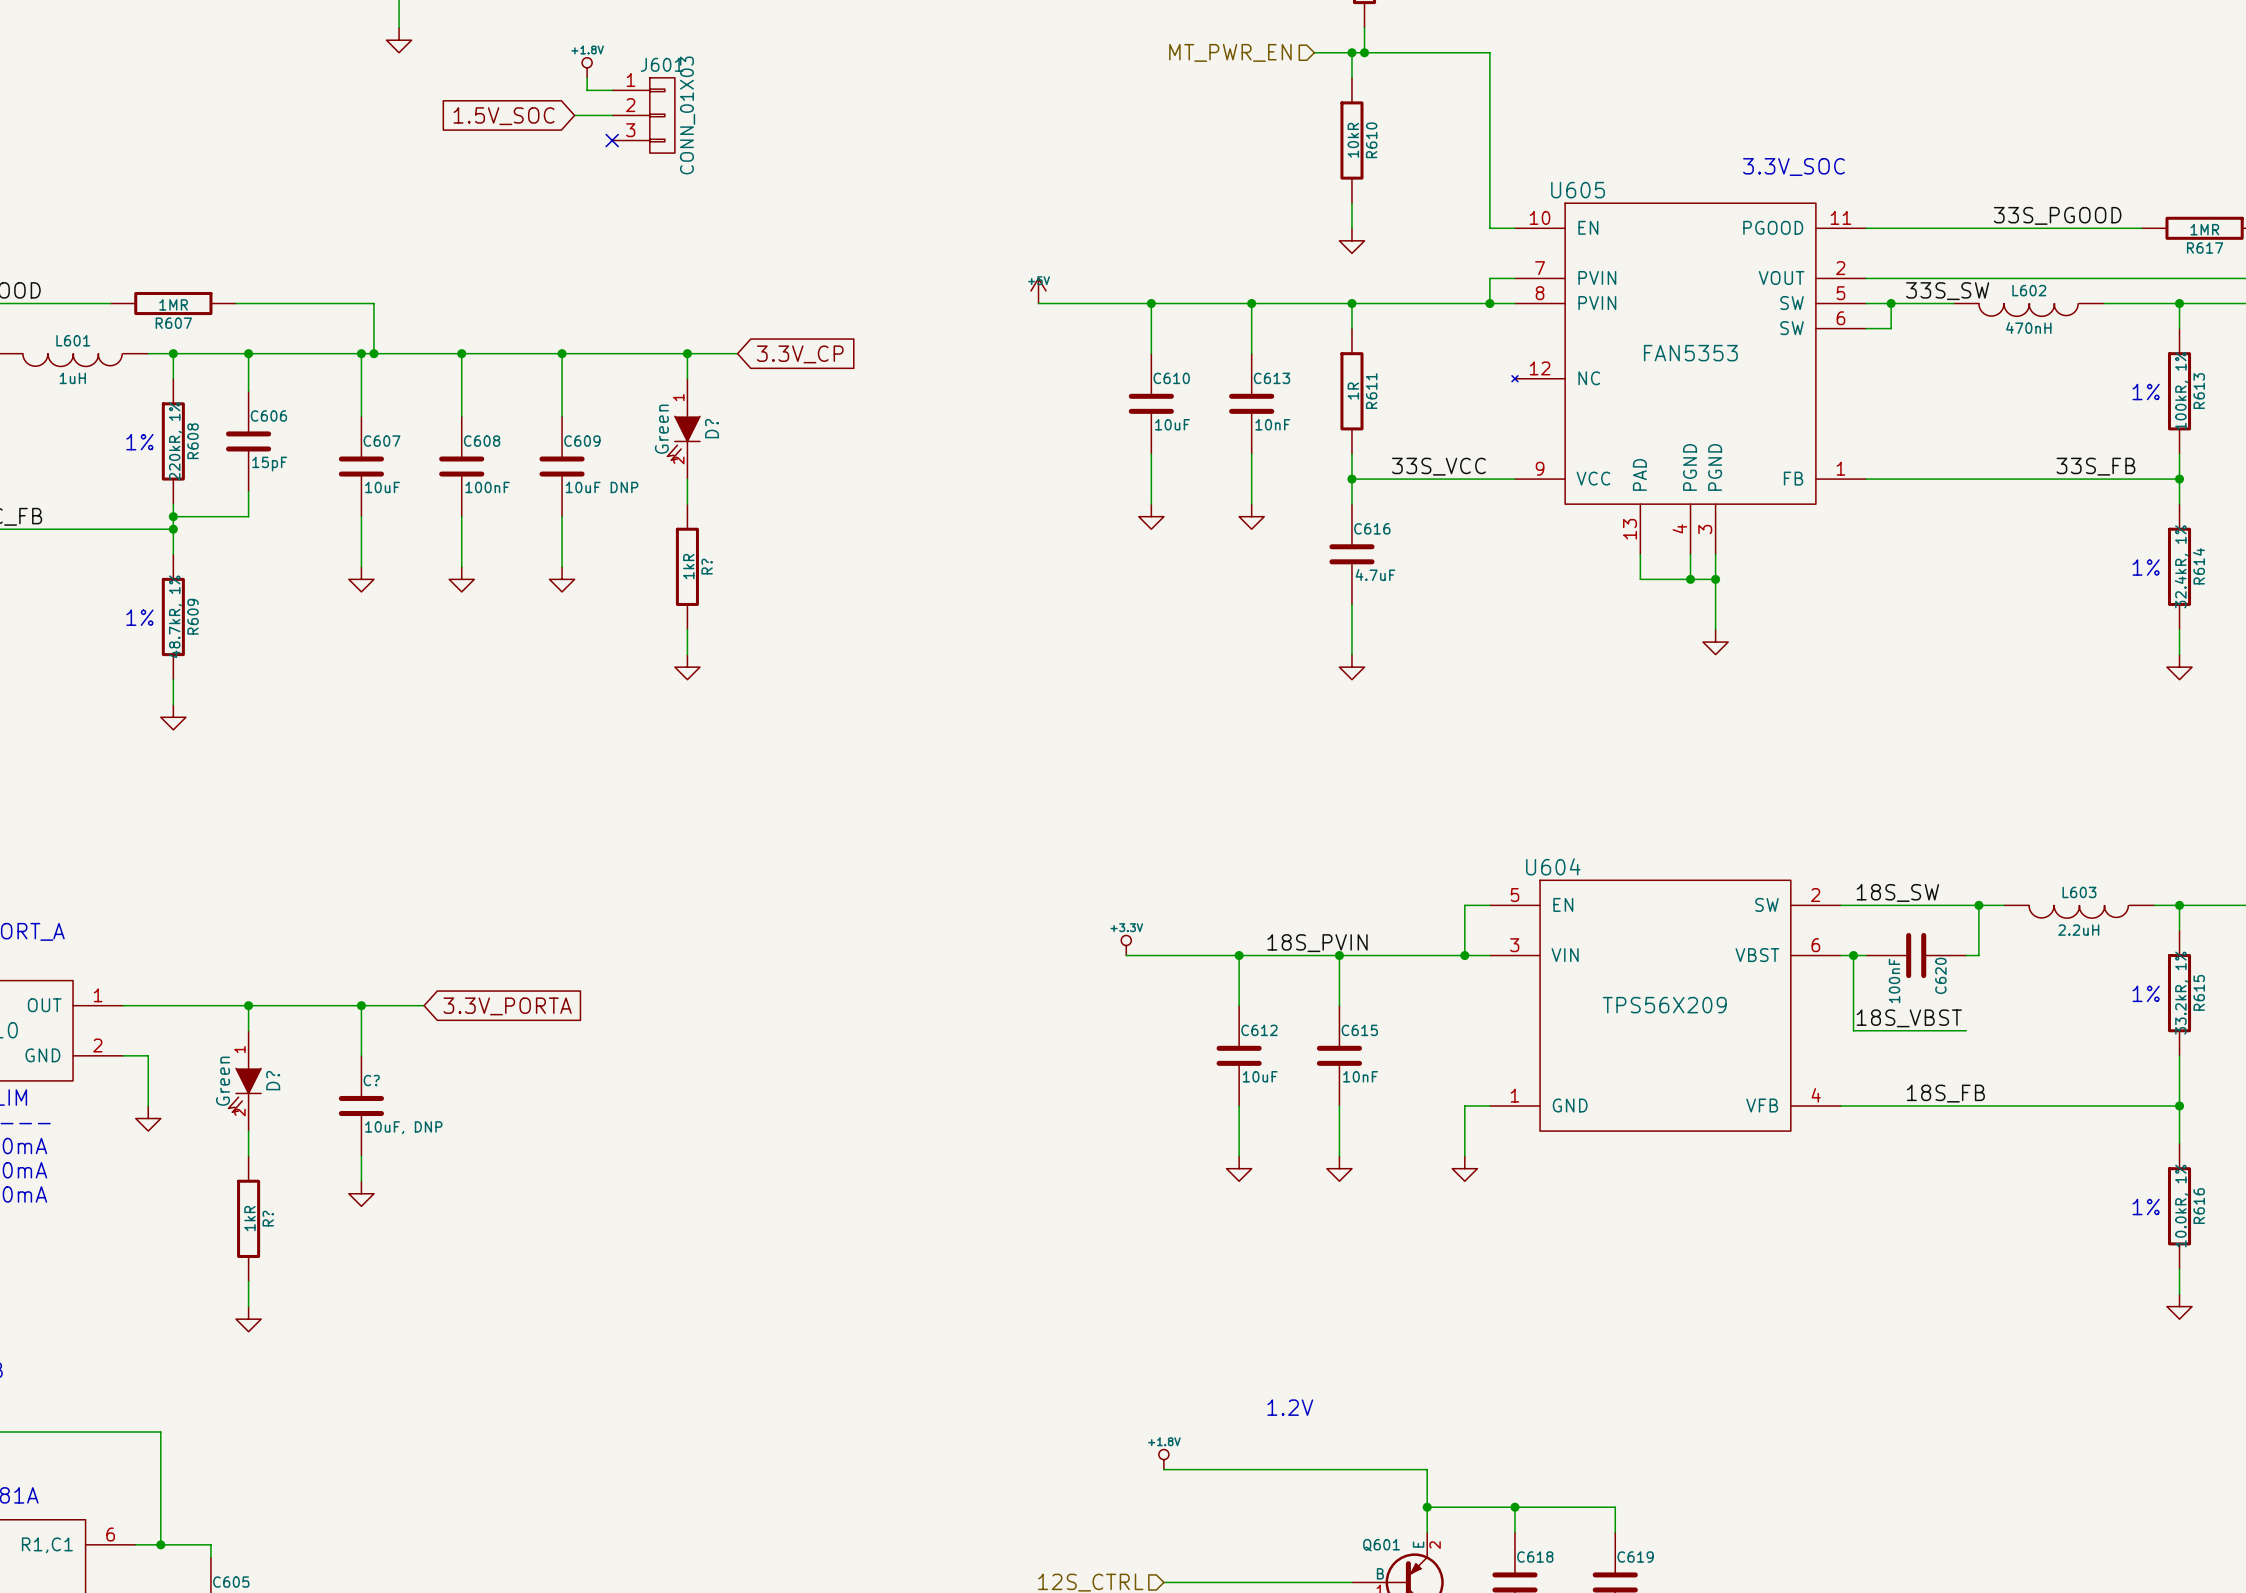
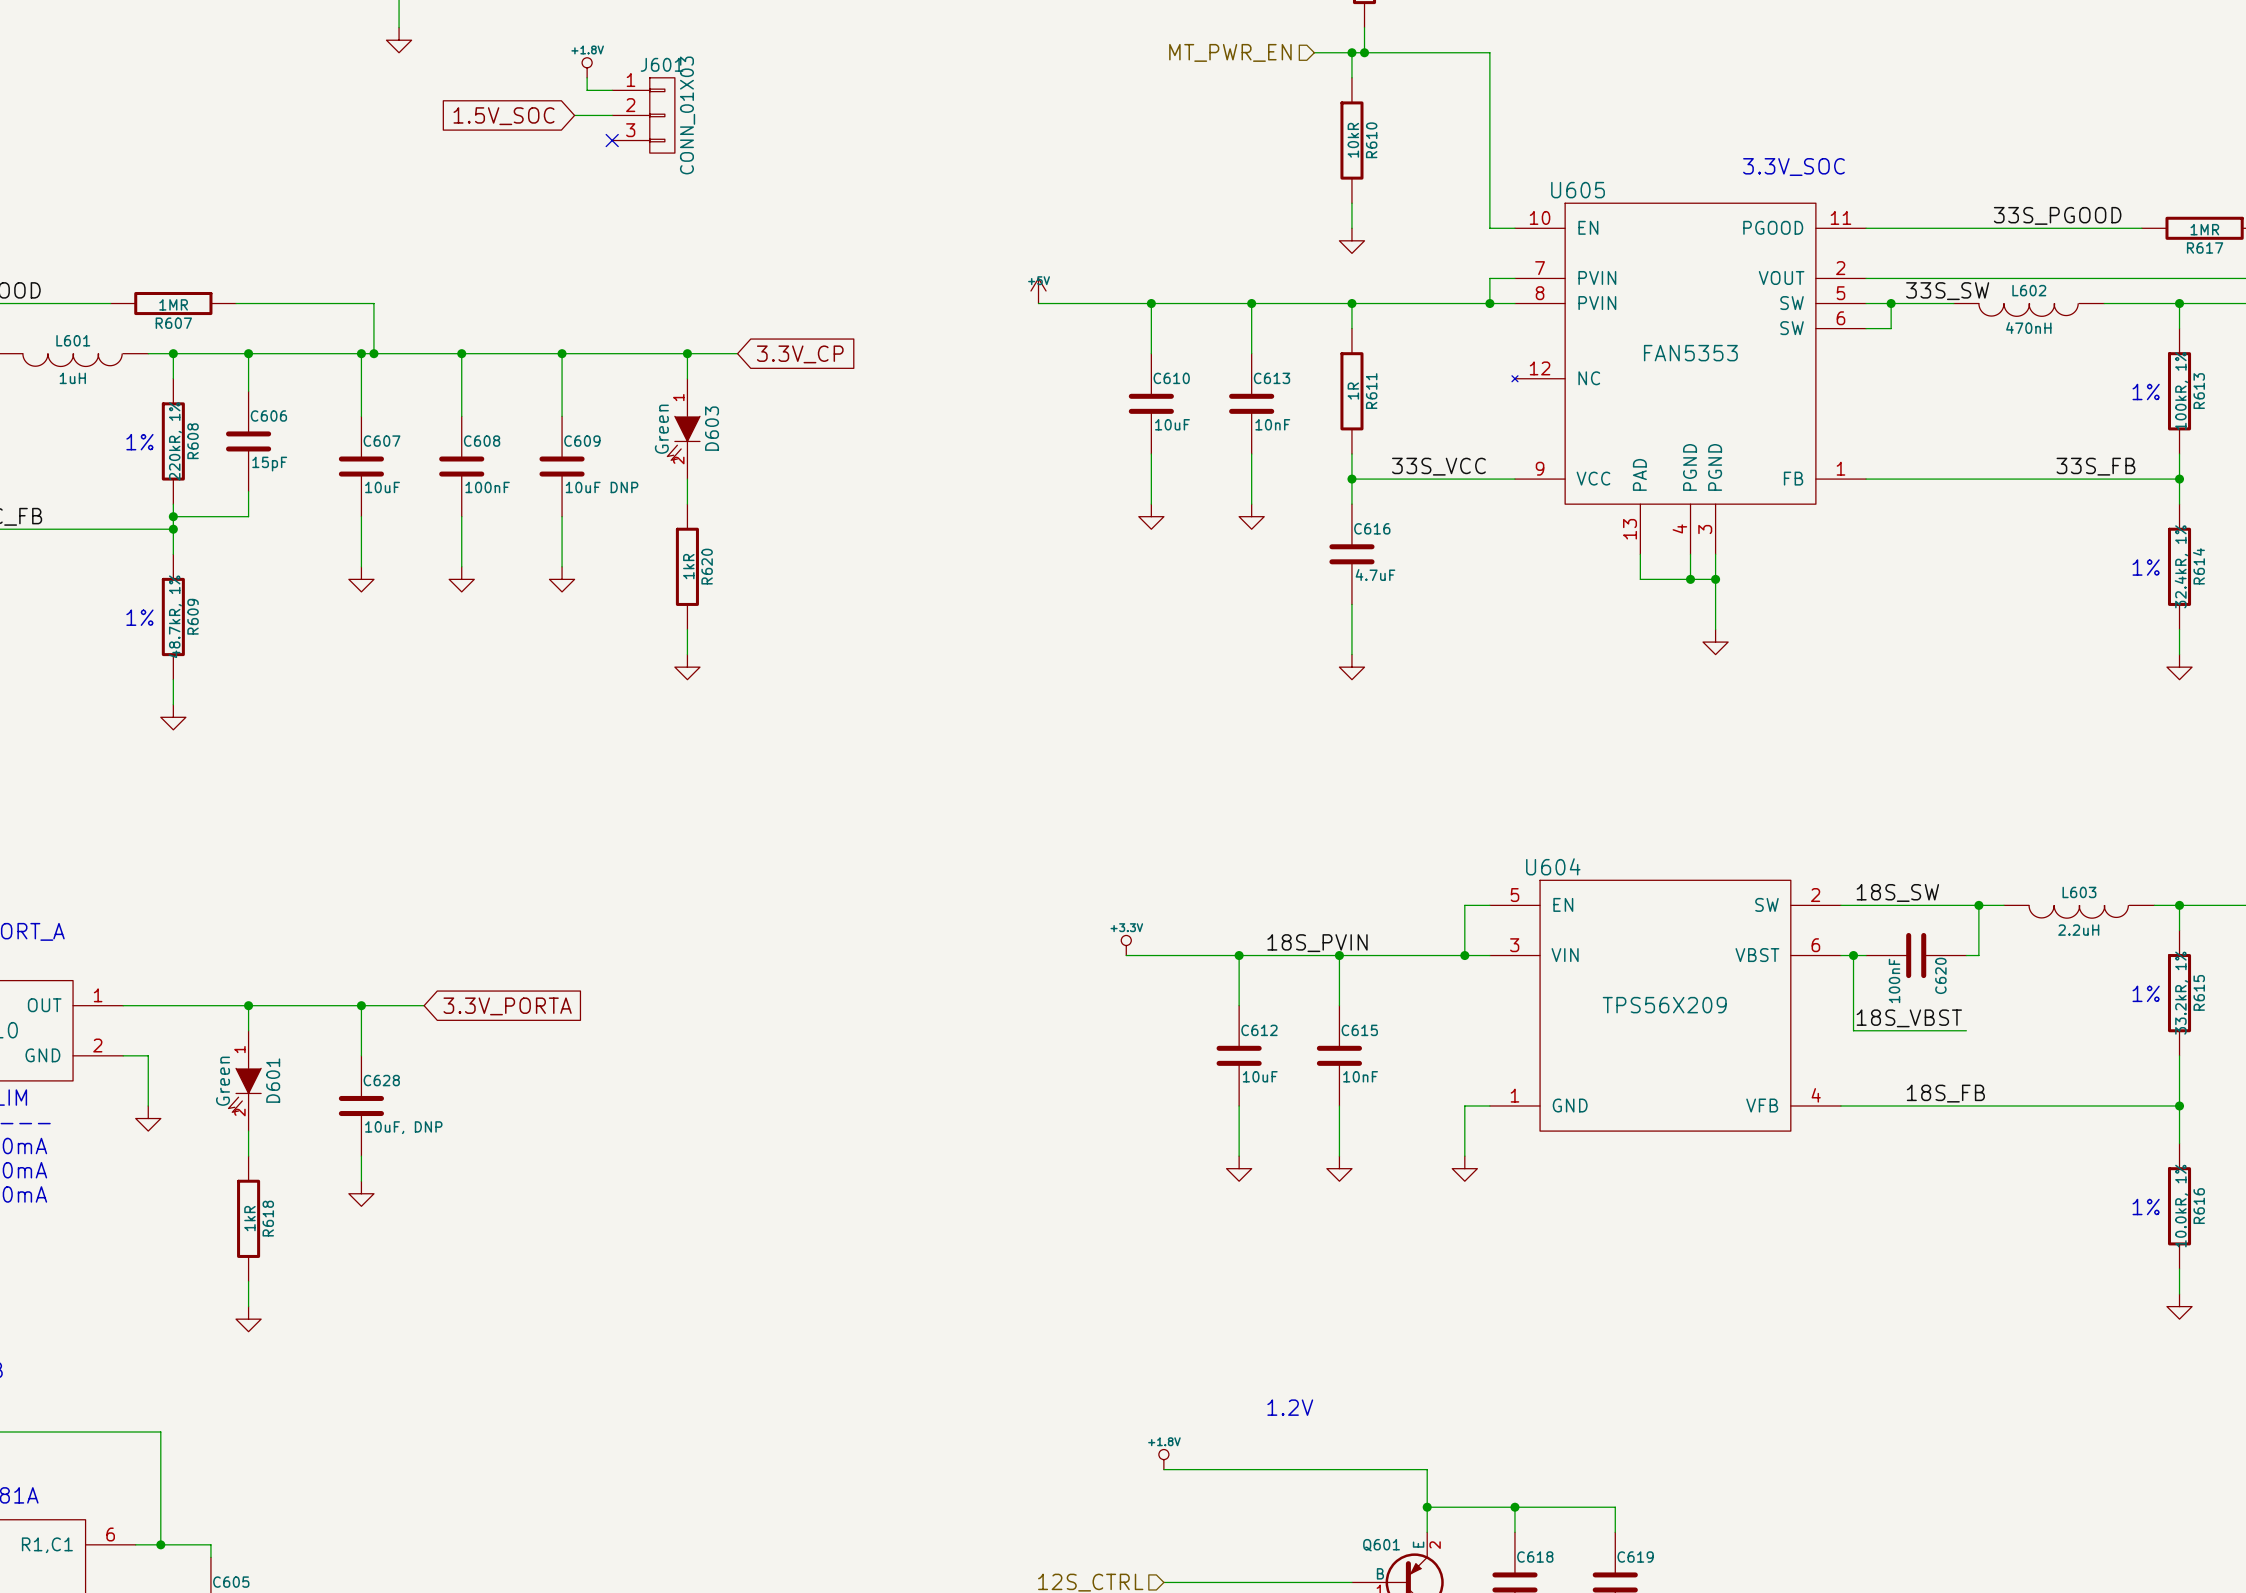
D? name: D? (712, 428) -> D603 (712, 428)
R? name: R? (707, 566) -> R620 (707, 566)
D? name: D? (273, 1080) -> D601 (273, 1080)
C? name: C? (371, 1080) -> C628 (381, 1080)
R? name: R? (268, 1218) -> R618 (268, 1218)

